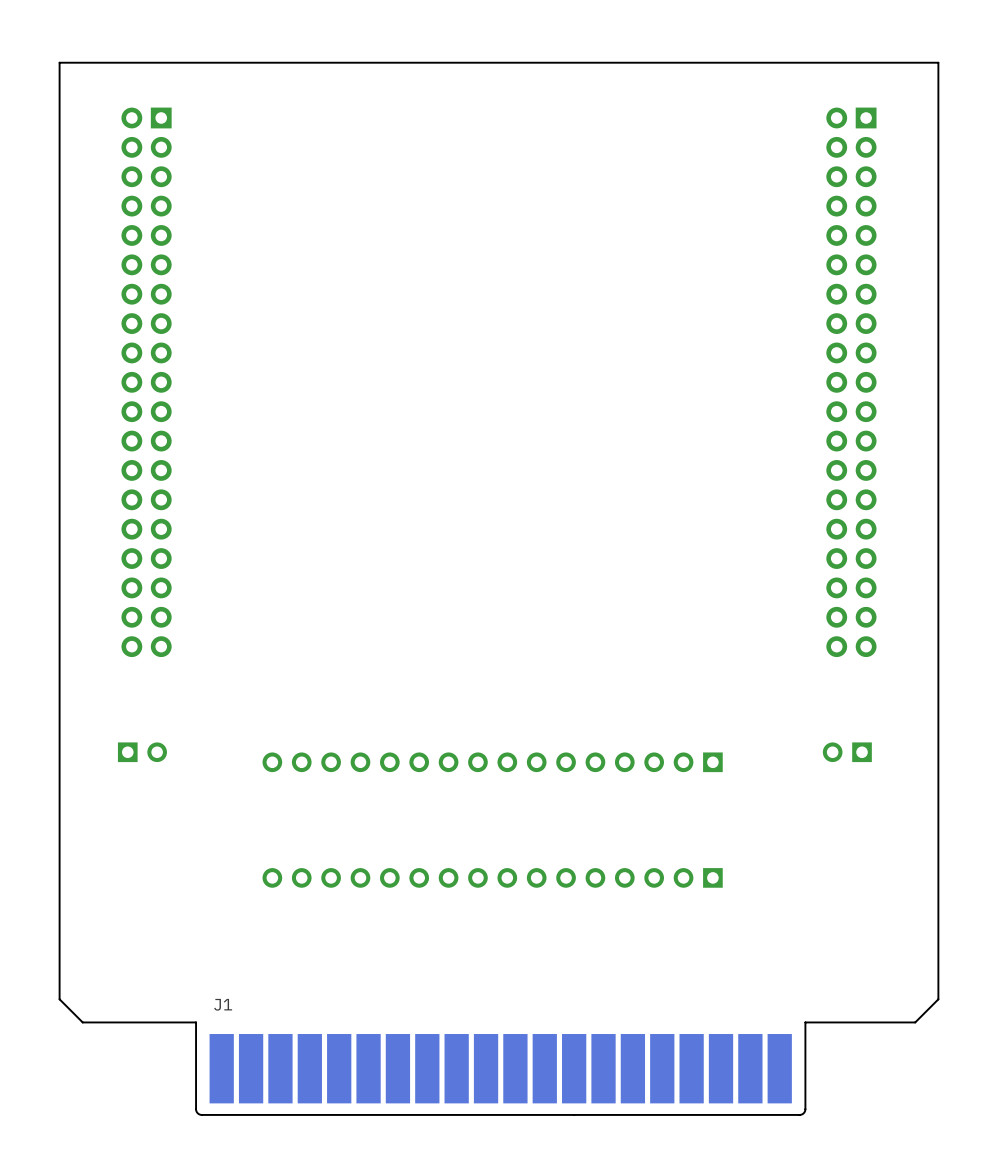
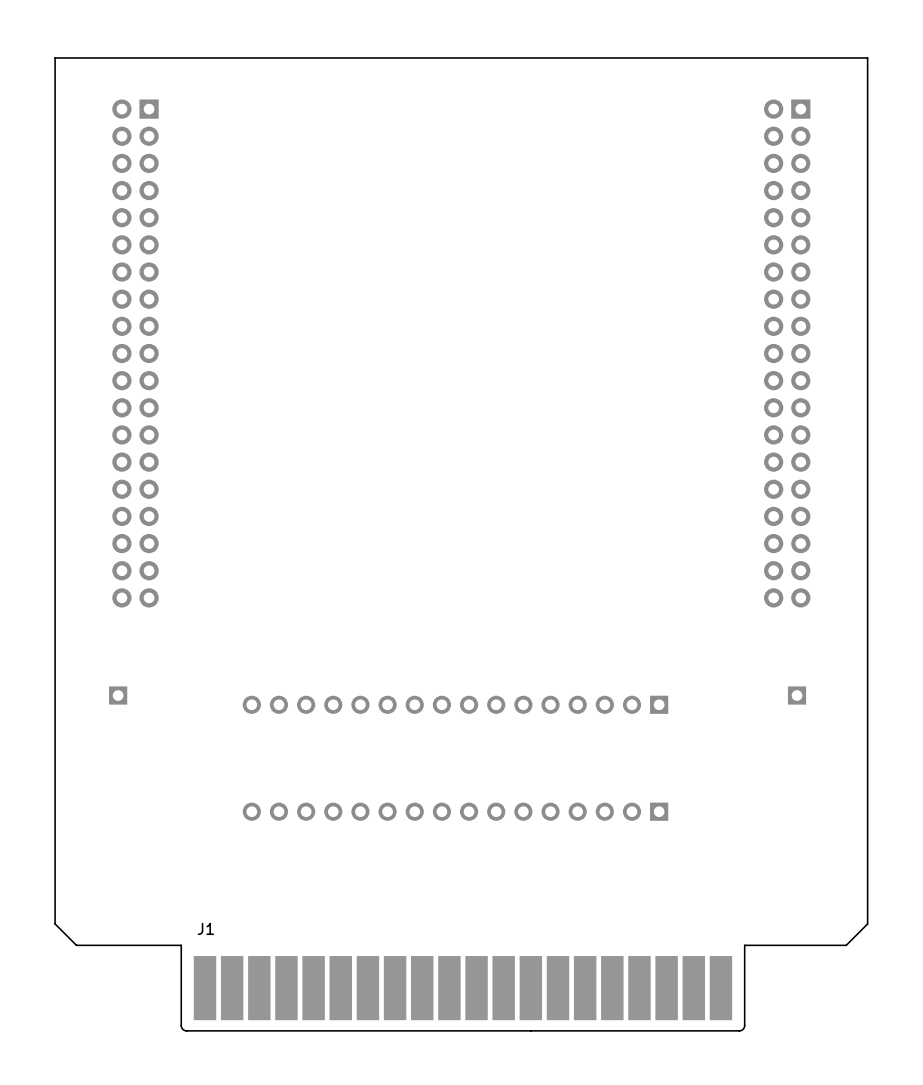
part: (142, 752) -> none
part: (847, 752) -> none

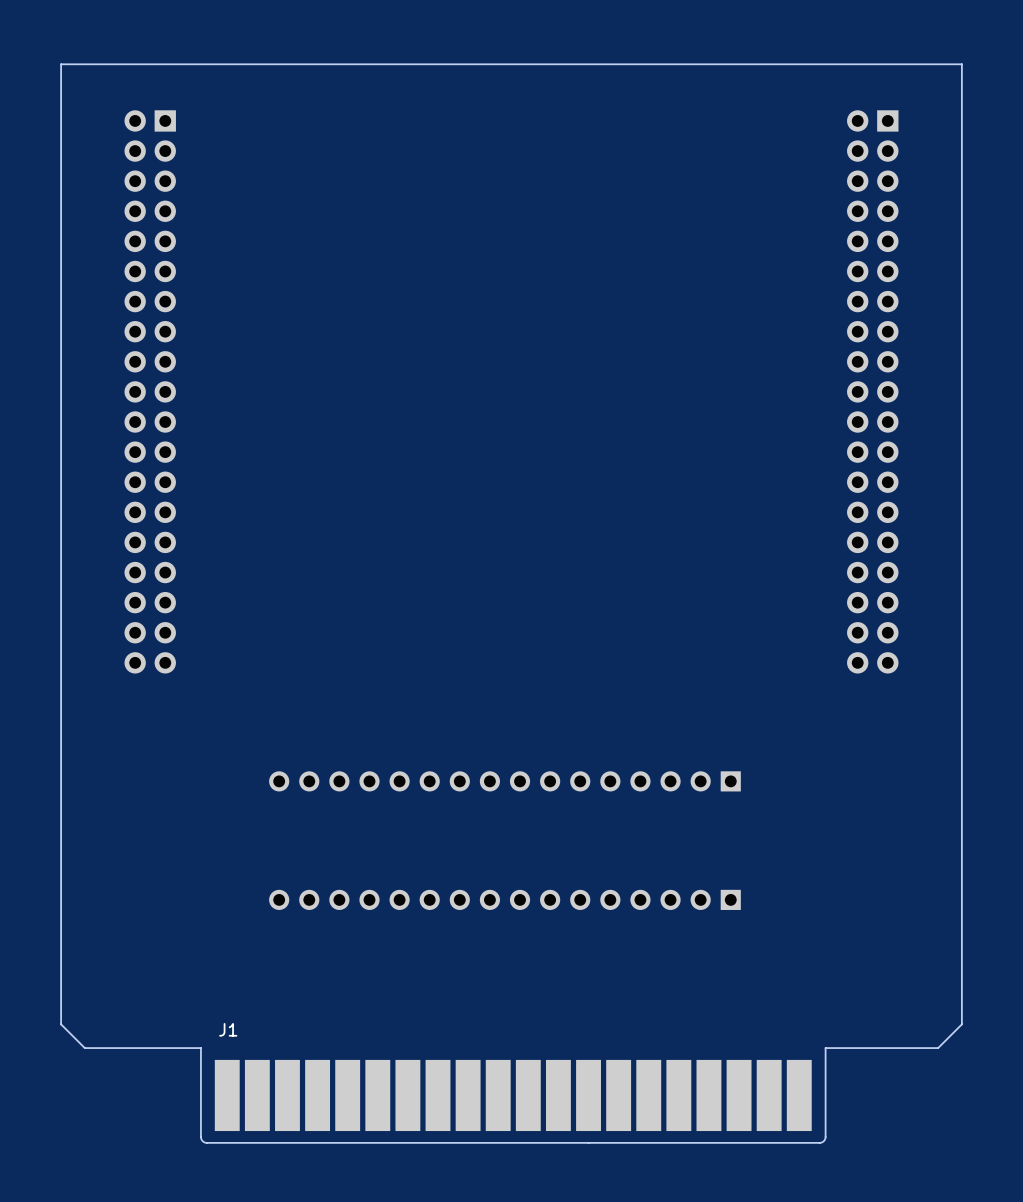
part: (118, 695) -> none
part: (797, 695) -> none

